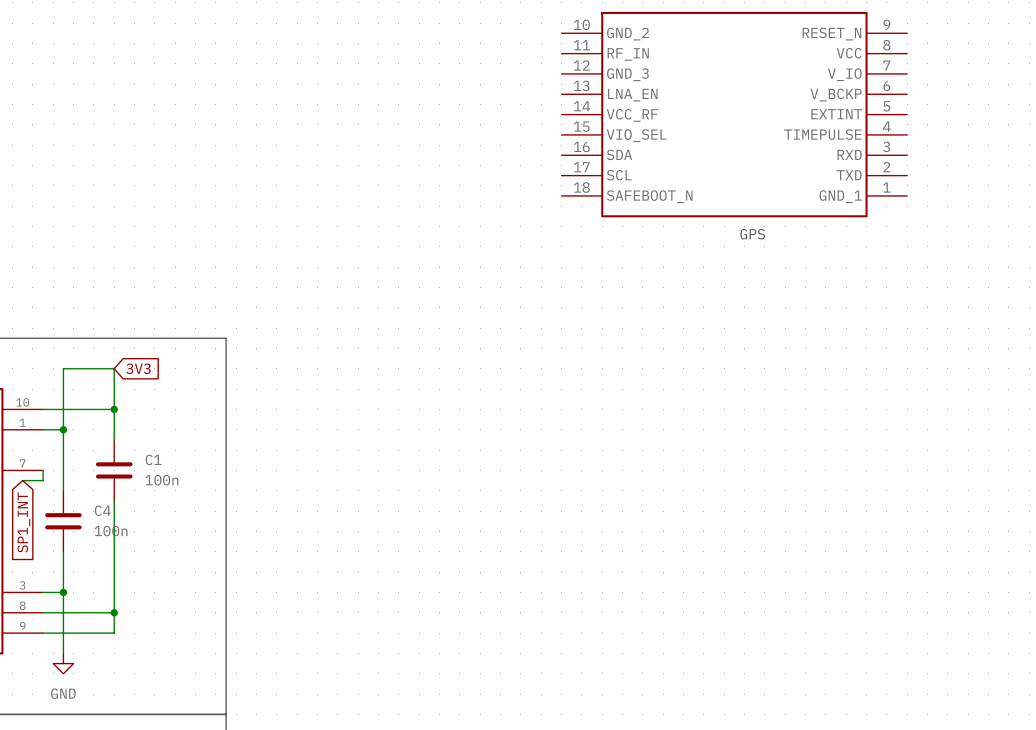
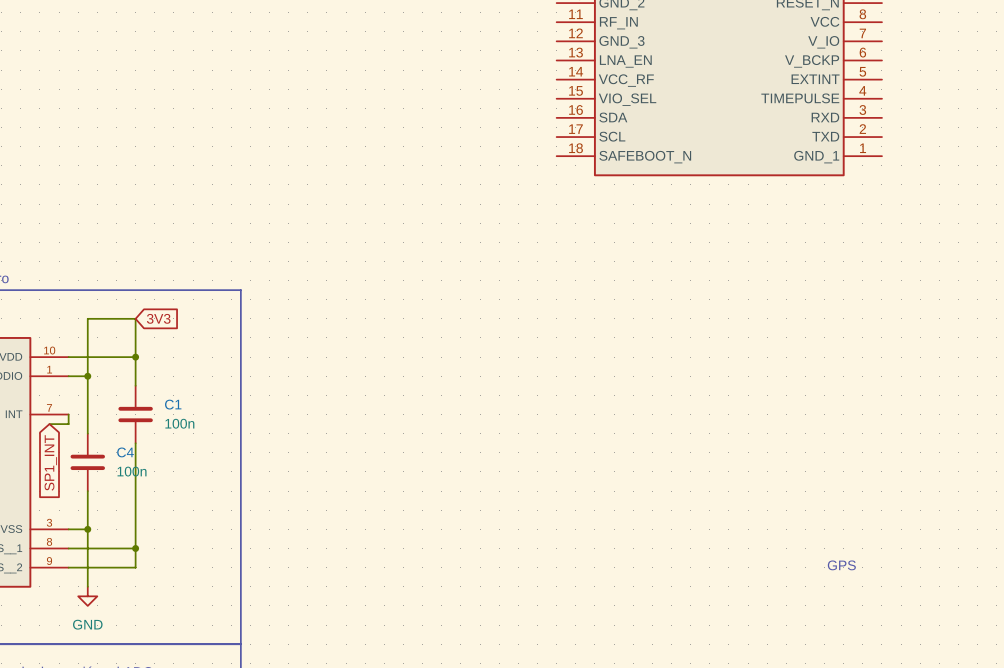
text: GPS (752, 234) -> none
text: none -> GPS (841, 565)

